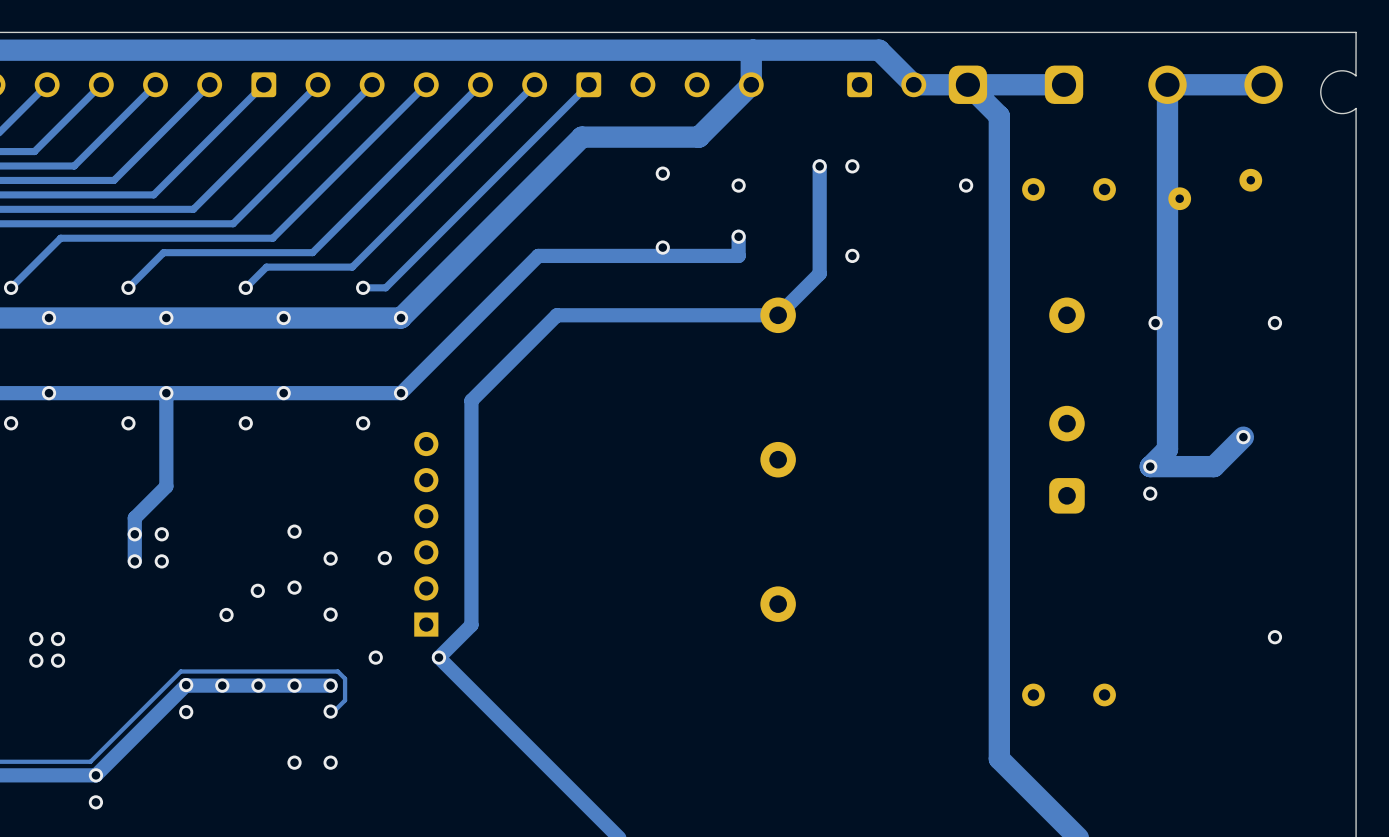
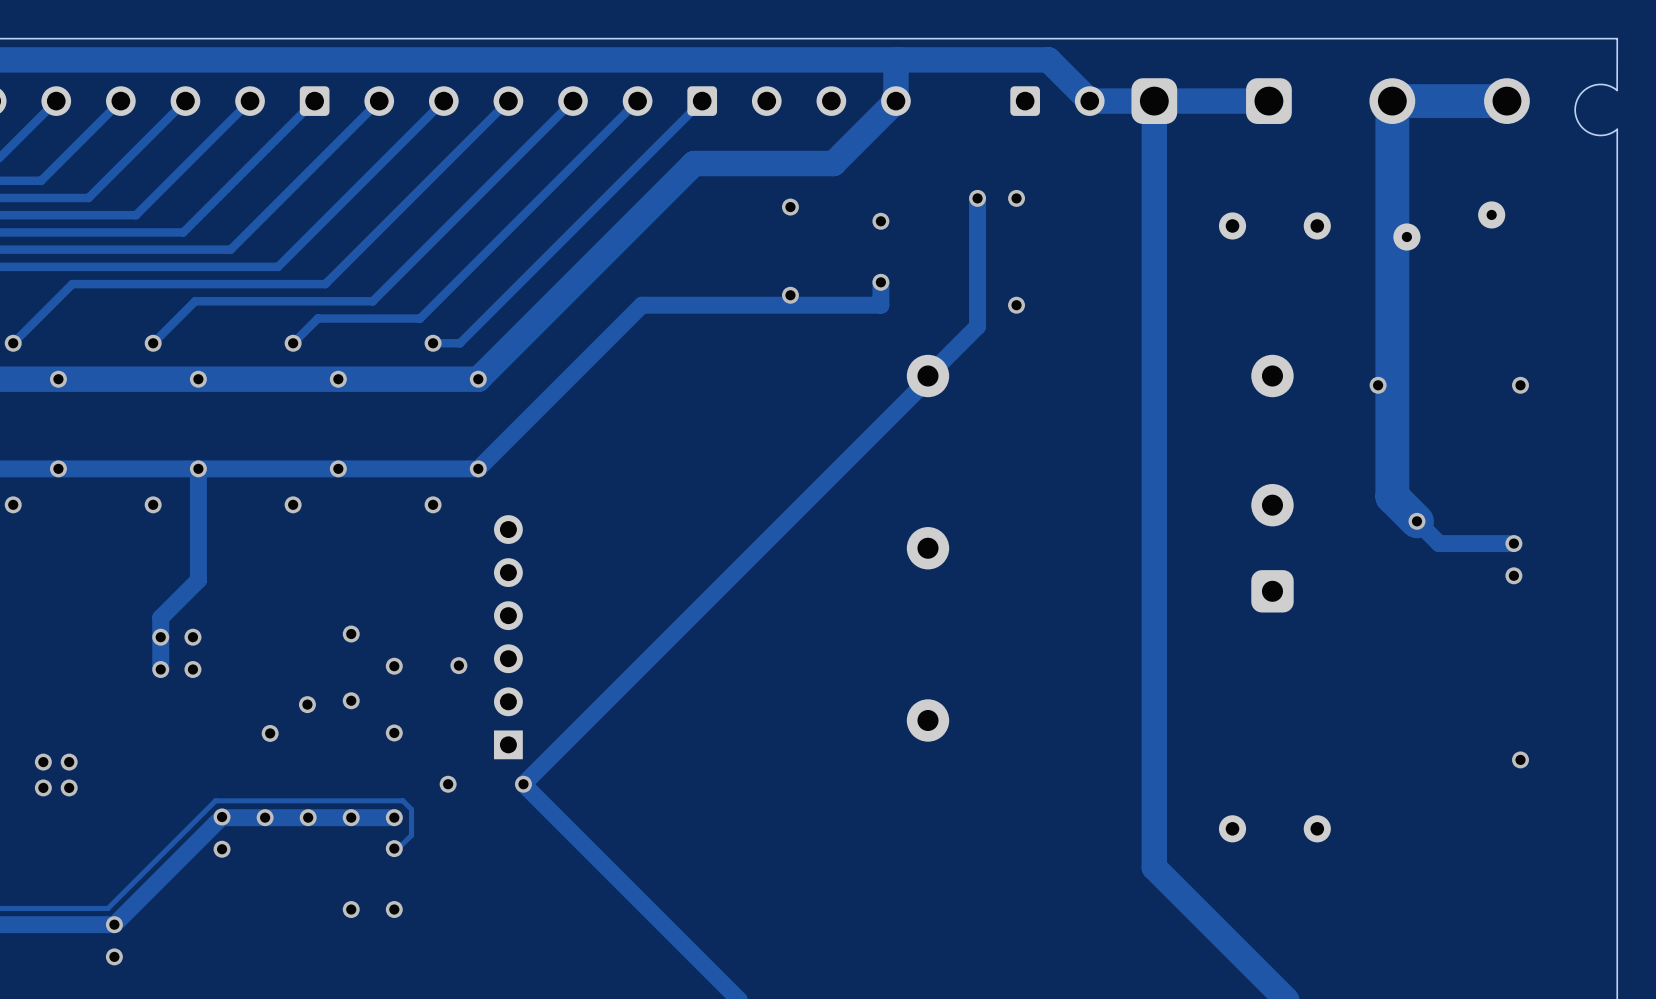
track: (967, 84) (999, 116) (999, 758) -> (1154, 101) (1154, 867) (1191, 905)
track width: thin (1263, 84) (1167, 84) (1167, 416) -> thick (1506, 101) (1392, 101) (1392, 496)
via: (966, 185) -> none
track: (778, 315) (556, 315) (471, 400) (471, 625) -> (928, 376) (928, 379) (562, 745)
track: (1167, 416) (1167, 449) (1150, 466) (1213, 466) (1243, 437) -> (1392, 496) (1439, 543) (1513, 543)
via: none -> (1417, 521)
via: (1243, 437) -> none
via: none -> (1513, 543)
via: (1150, 466) -> none
via: none -> (1513, 575)
via: (1150, 493) -> none

